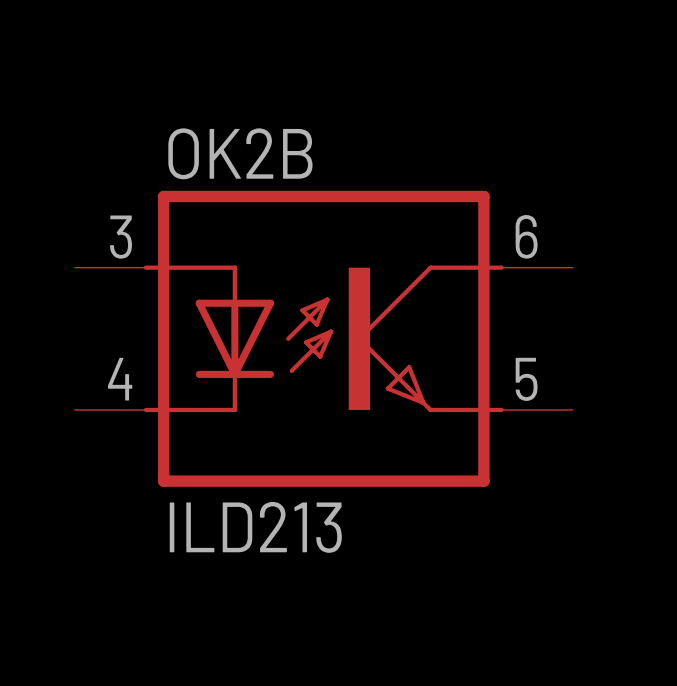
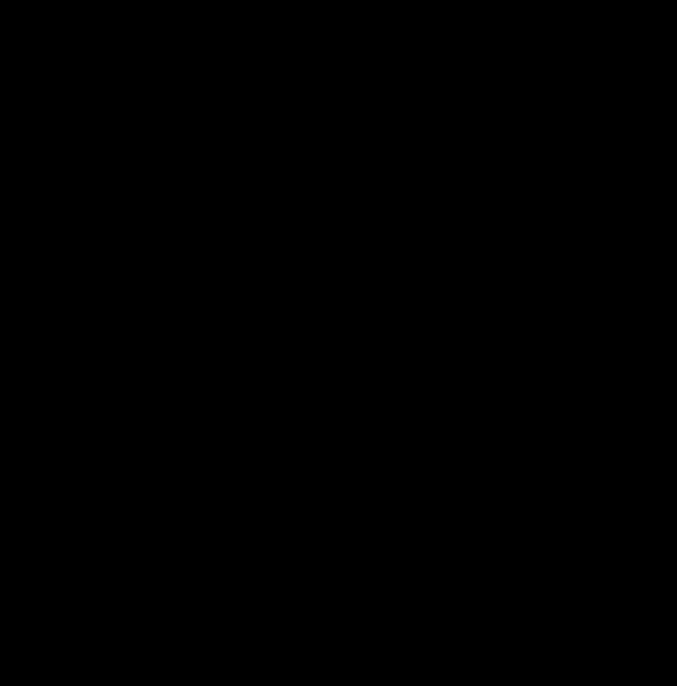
OK2B: ILD213 (323, 338) -> none

